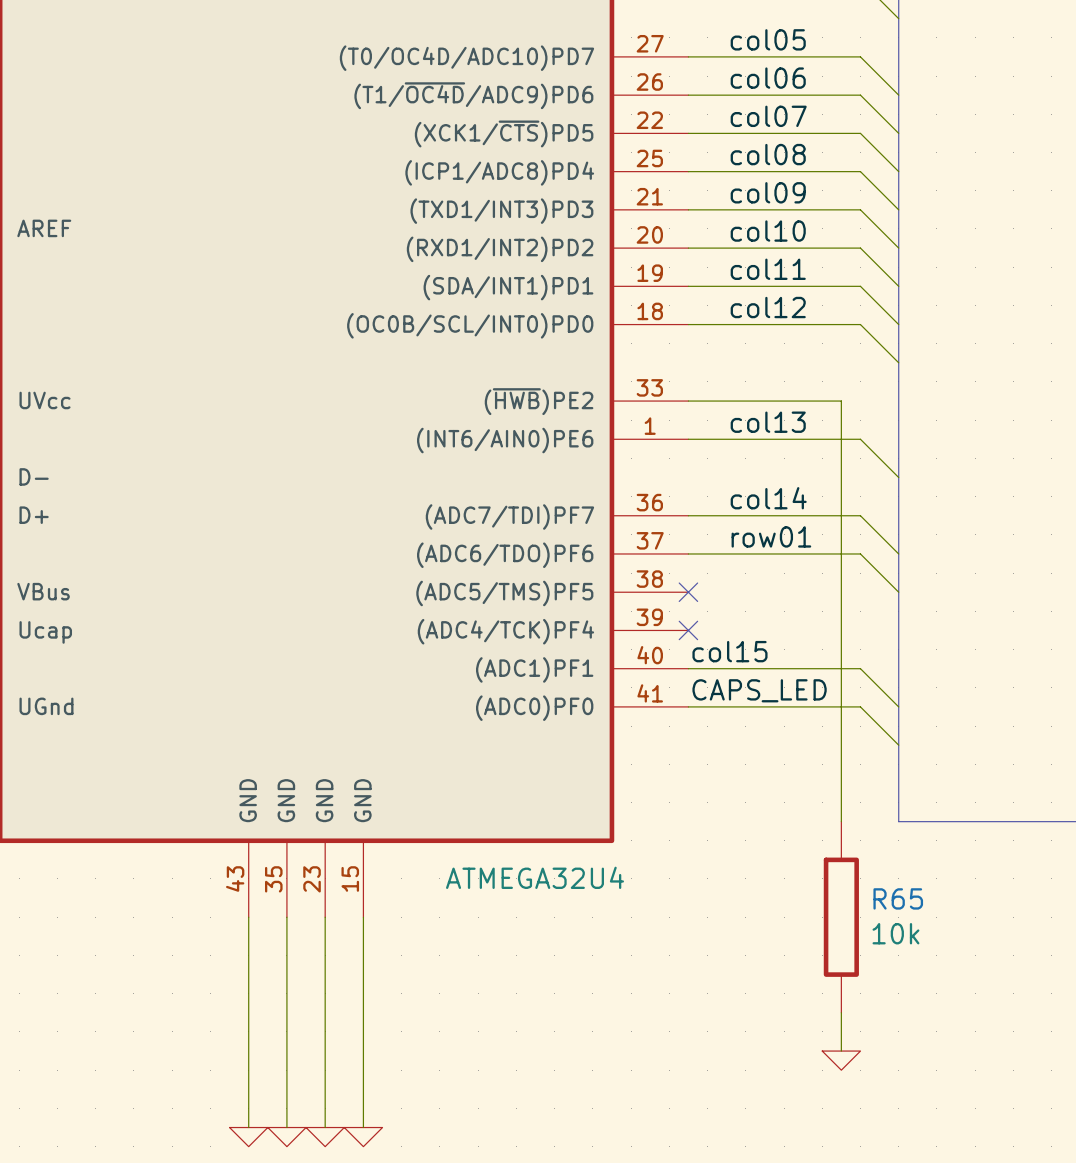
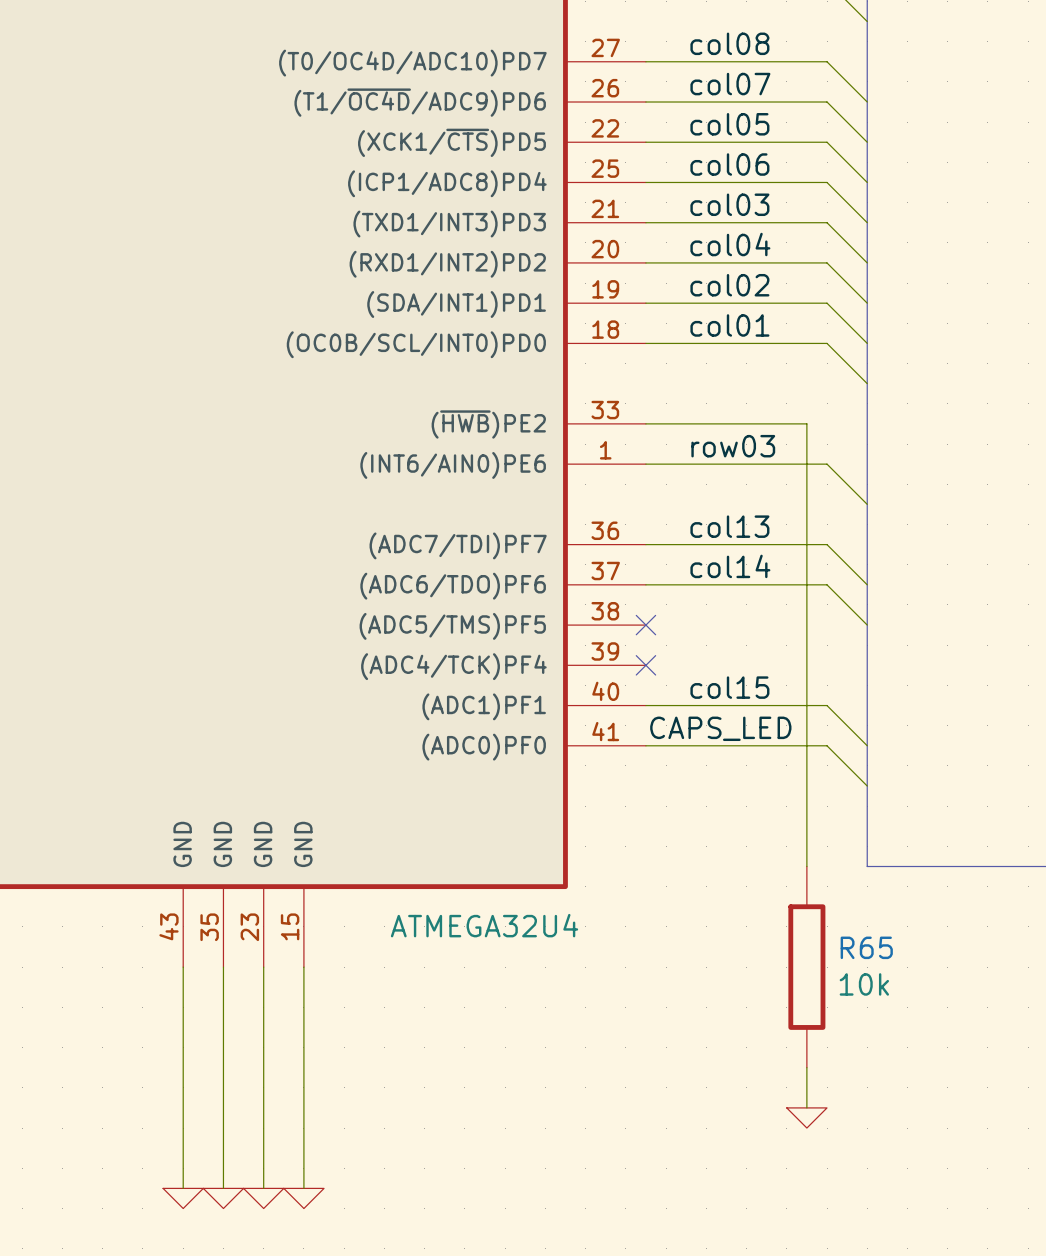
label: col05 (768, 39) -> col08 (729, 43)
label: col06 (768, 78) -> col07 (730, 84)
label: col07 (768, 116) -> col05 (729, 124)
label: col08 (768, 154) -> col06 (729, 164)
label: col09 (768, 192) -> col03 (729, 204)
label: col10 (768, 231) -> col04 (730, 244)
label: col11 (768, 269) -> col02 (729, 285)
label: col12 (768, 307) -> col01 (729, 325)
label: col13 (768, 422) -> row03 (733, 446)
label: col14 (768, 498) -> col13 (729, 526)
label: row01 (771, 536) -> col14 (730, 566)
label position: col15 (729, 651) -> col15 (729, 687)

